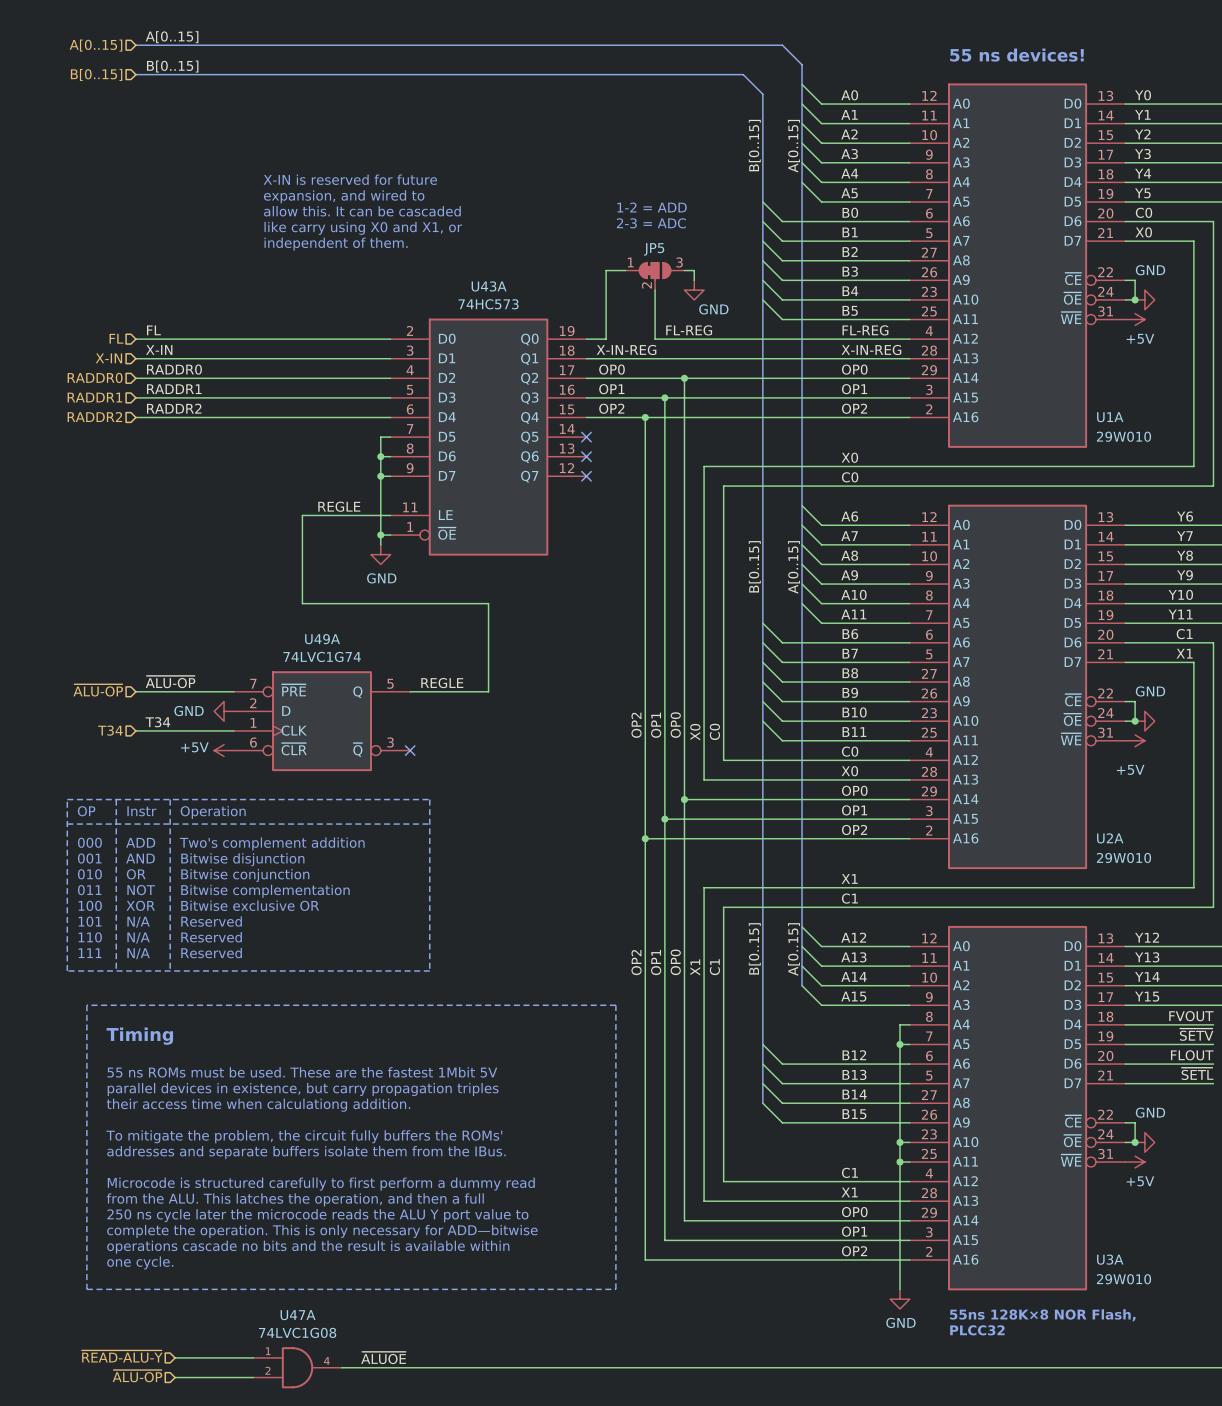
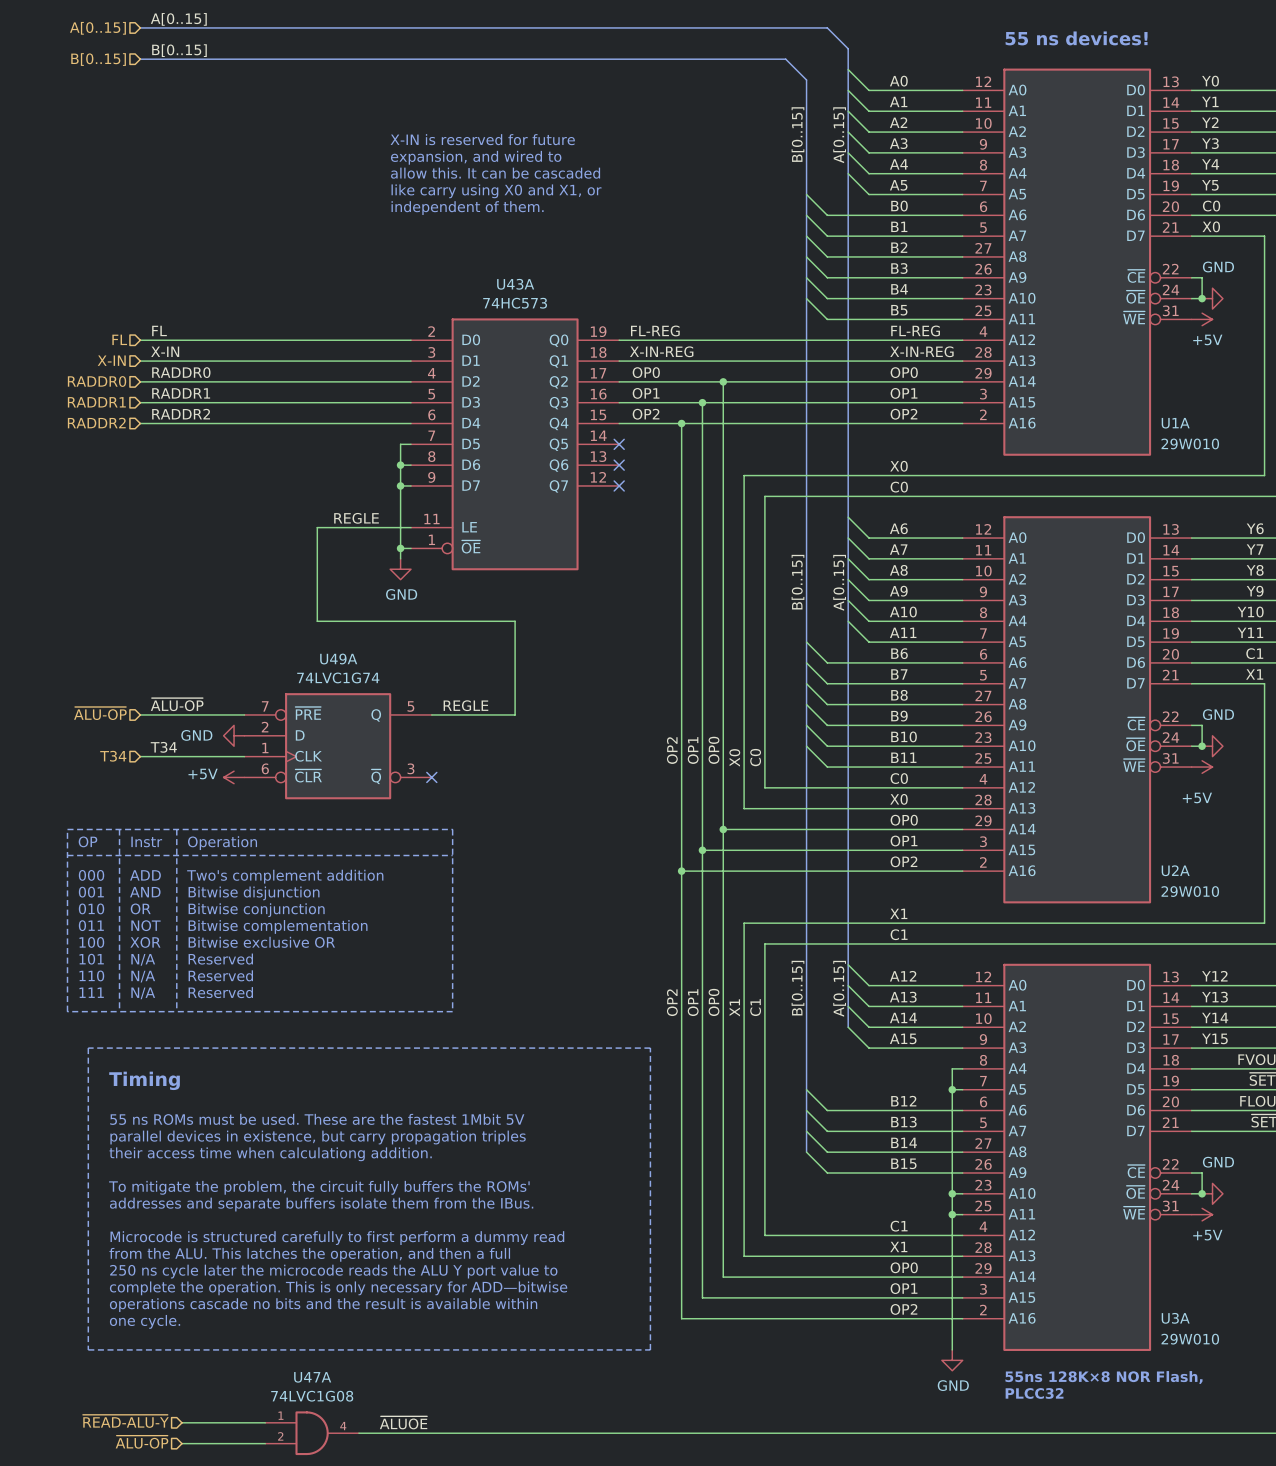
text position: X-IN is reserved for future (350, 179) -> X-IN is reserved for future (482, 139)
text position: expansion, and wired to (344, 196) -> expansion, and wired to (476, 157)
text: 1-2 = ADD (652, 207) -> none
text position: allow this. It can be cascaded (362, 211) -> allow this. It can be cascaded (495, 173)
text: 2-3 = ADC (651, 223) -> none
text position: like carry using X0 and X1, or (363, 228) -> like carry using X0 and X1, or (496, 191)
text position: independent of them. (336, 244) -> independent of them. (467, 208)
wire: (625, 270) (606, 270) (606, 339) -> none
wire: (684, 270) (694, 270) (694, 280) -> none
JP5: (655, 276) -> none
wire: (655, 290) (655, 339) -> (640, 340) (692, 340)
power symbol: GND (694, 290) -> none
label position: FL-REG (689, 330) -> FL-REG (655, 330)

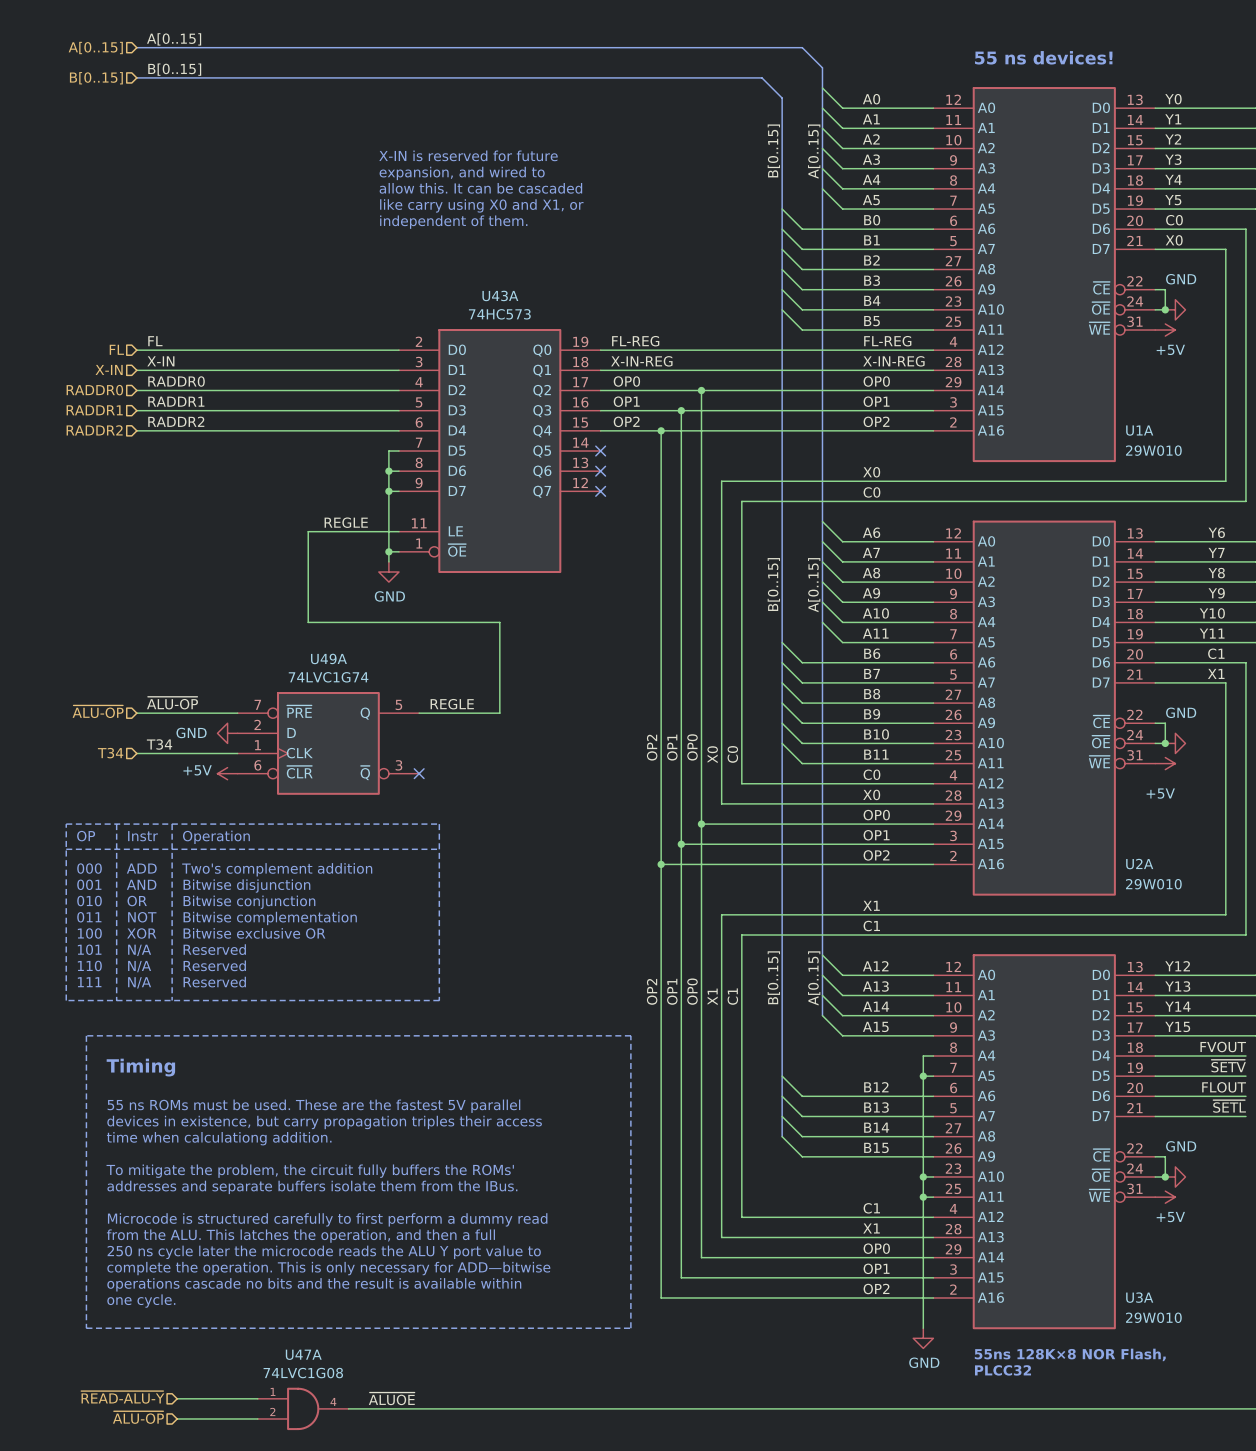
text: 55 ns ROMs must be used. These are the fastest 1Mbit 5V (317, 1119) -> 55 ns ROMs must be used. These are the fastest 5V parallel (313, 1106)
text: parallel devices in existence, but carry propagation triples (318, 1137) -> devices in existence, but carry propagation triples their access (324, 1122)
text: their access time when calculationg addition. (270, 1154) -> time when calculationg addition. (219, 1138)

